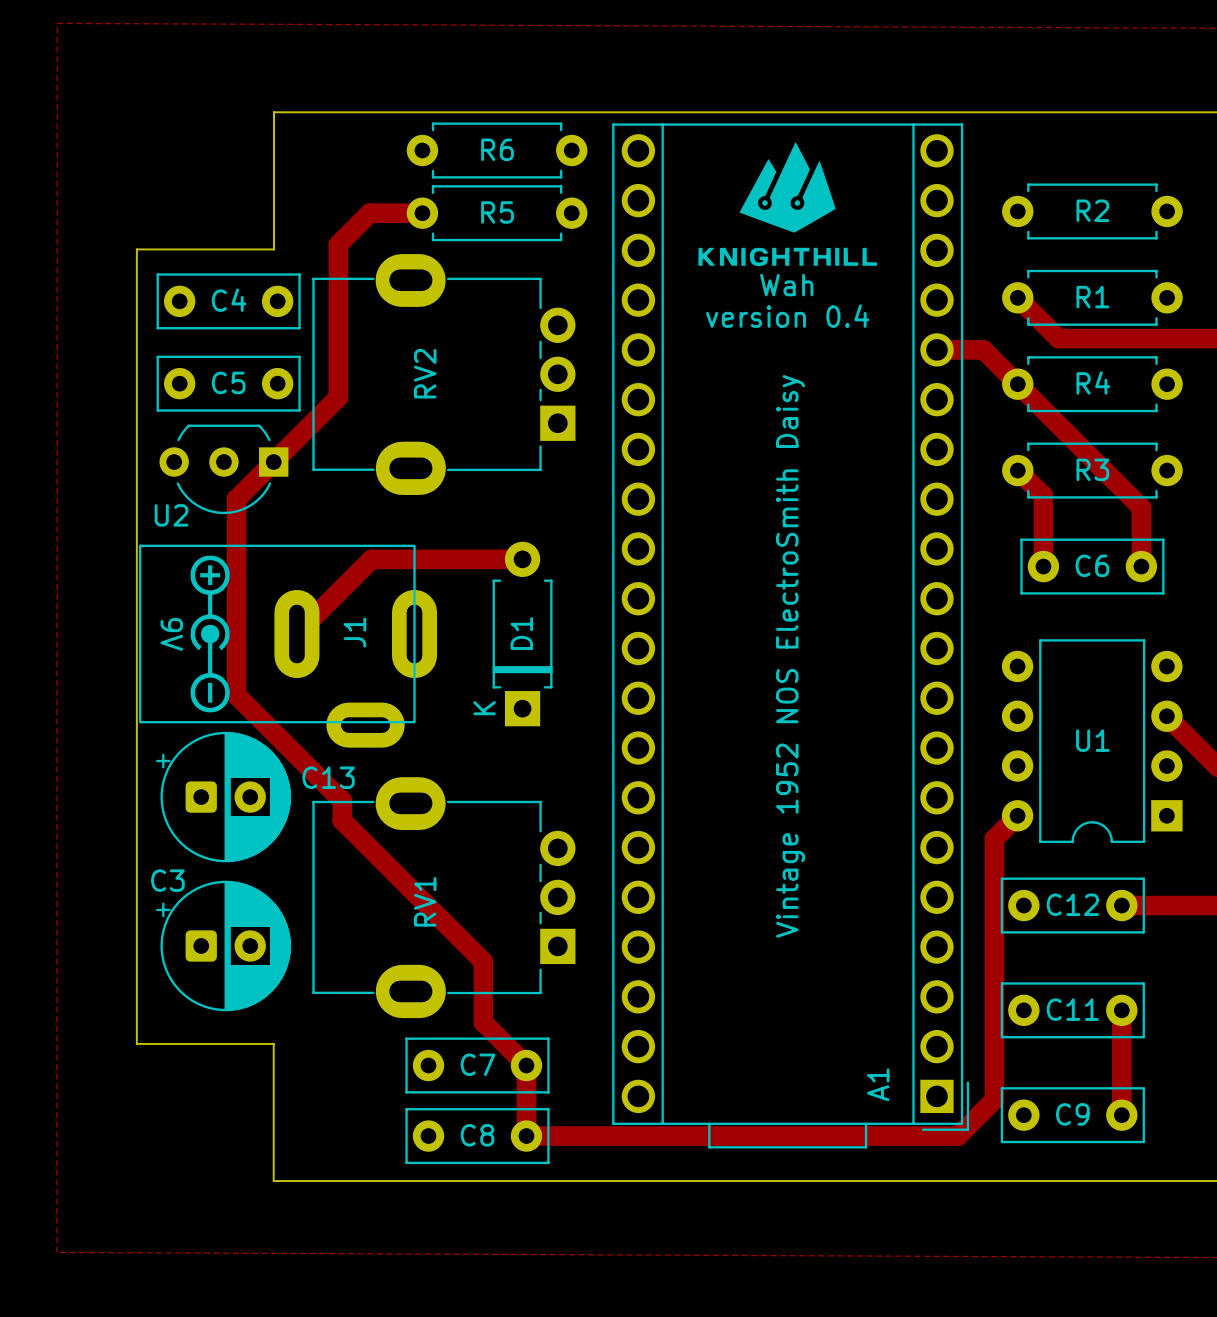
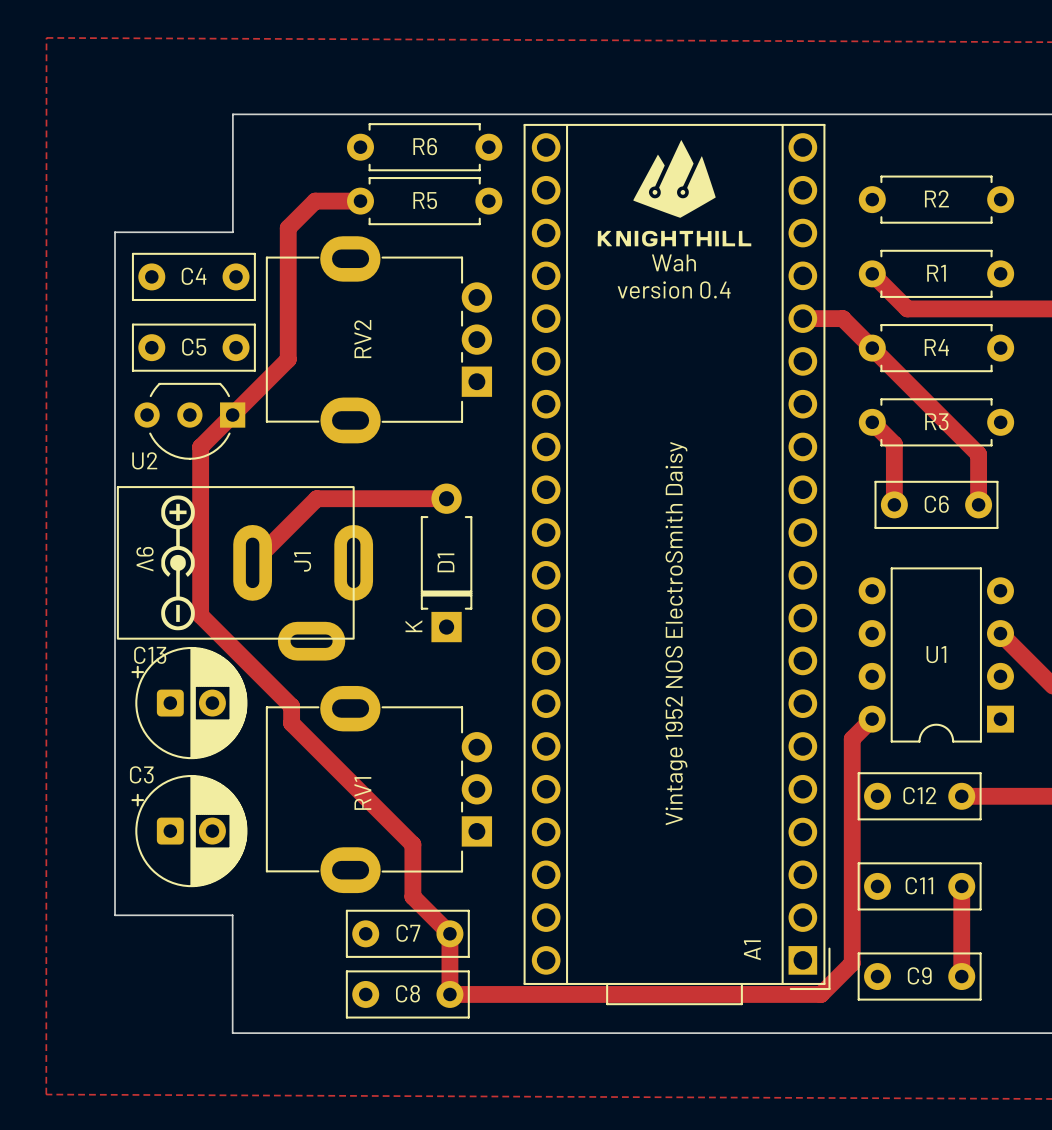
C13 name position: C13 (328, 777) -> C13 (150, 655)

